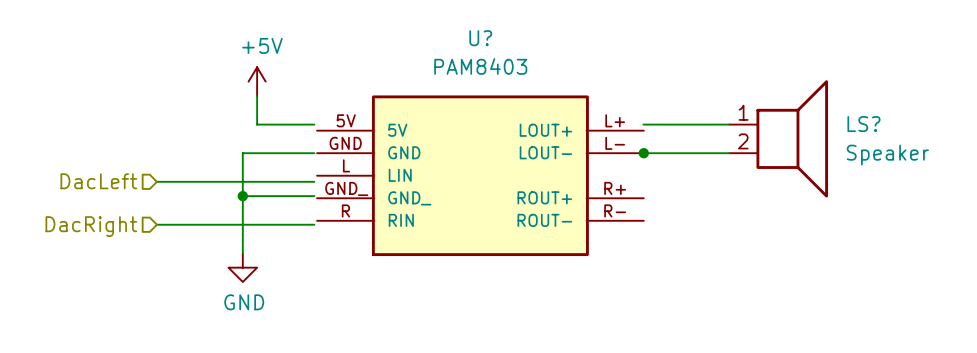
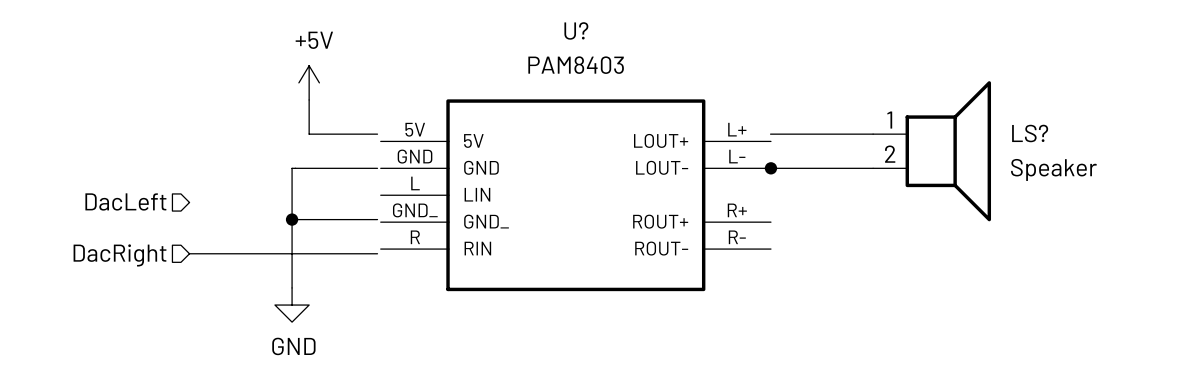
wire: (156, 181) (314, 181) -> none

